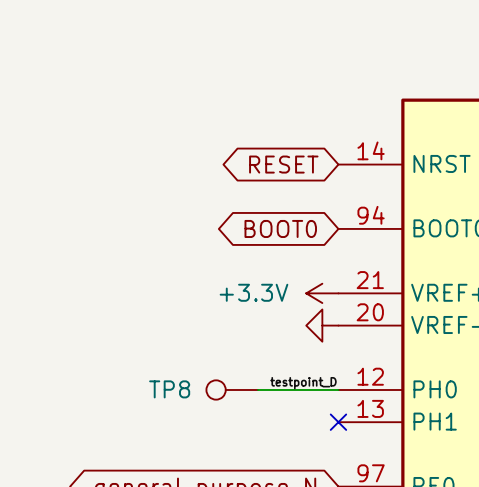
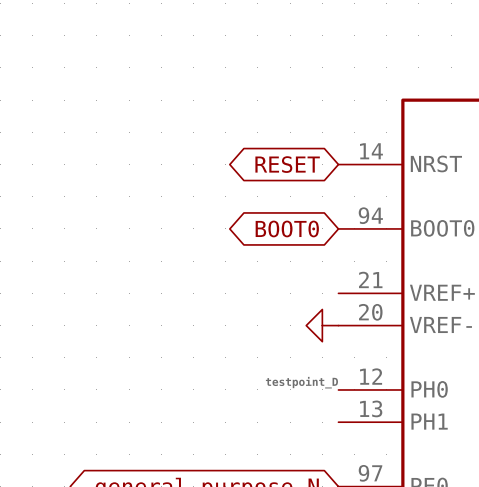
power symbol: +3.3V (322, 293) -> none
TP8: (232, 389) -> none
wire: (257, 389) (338, 389) -> none
no-connect mark: (338, 422) -> none

